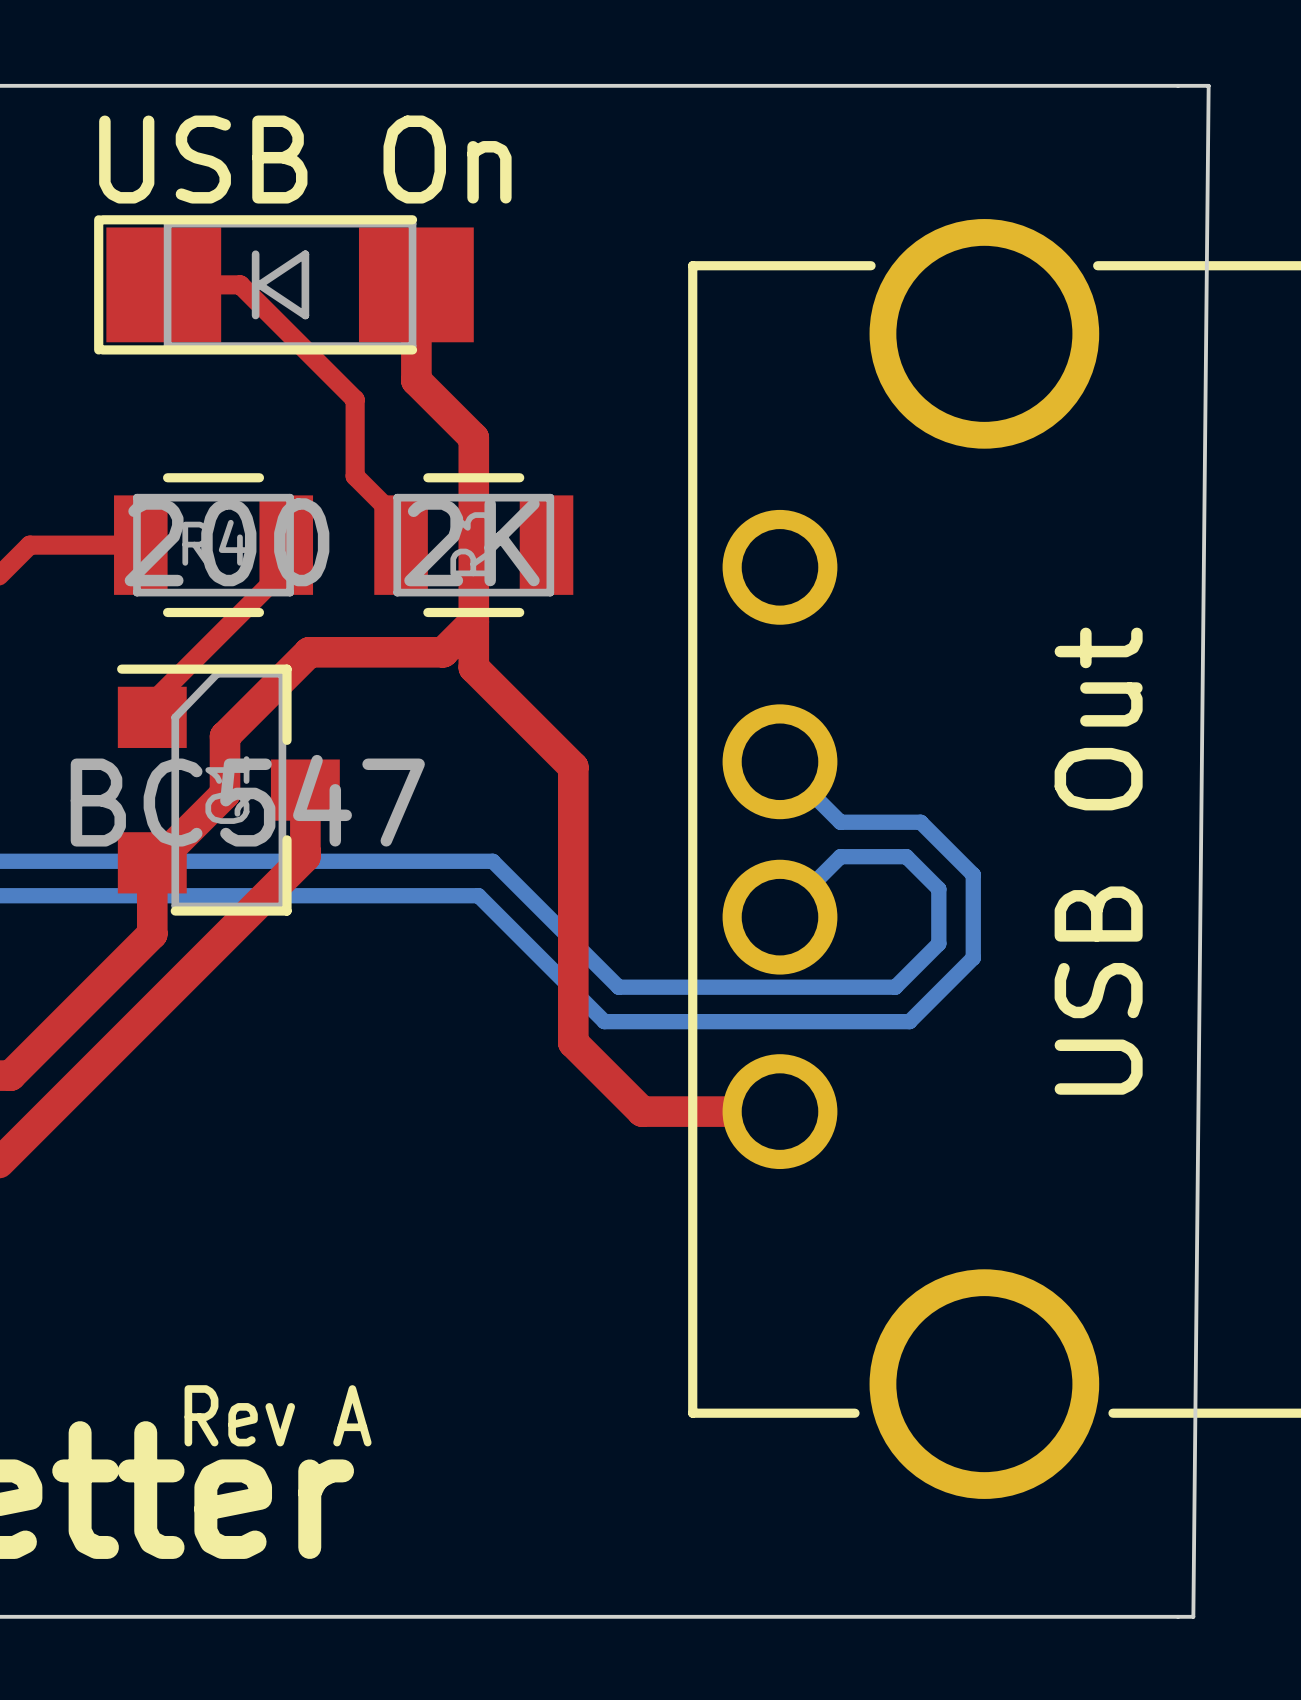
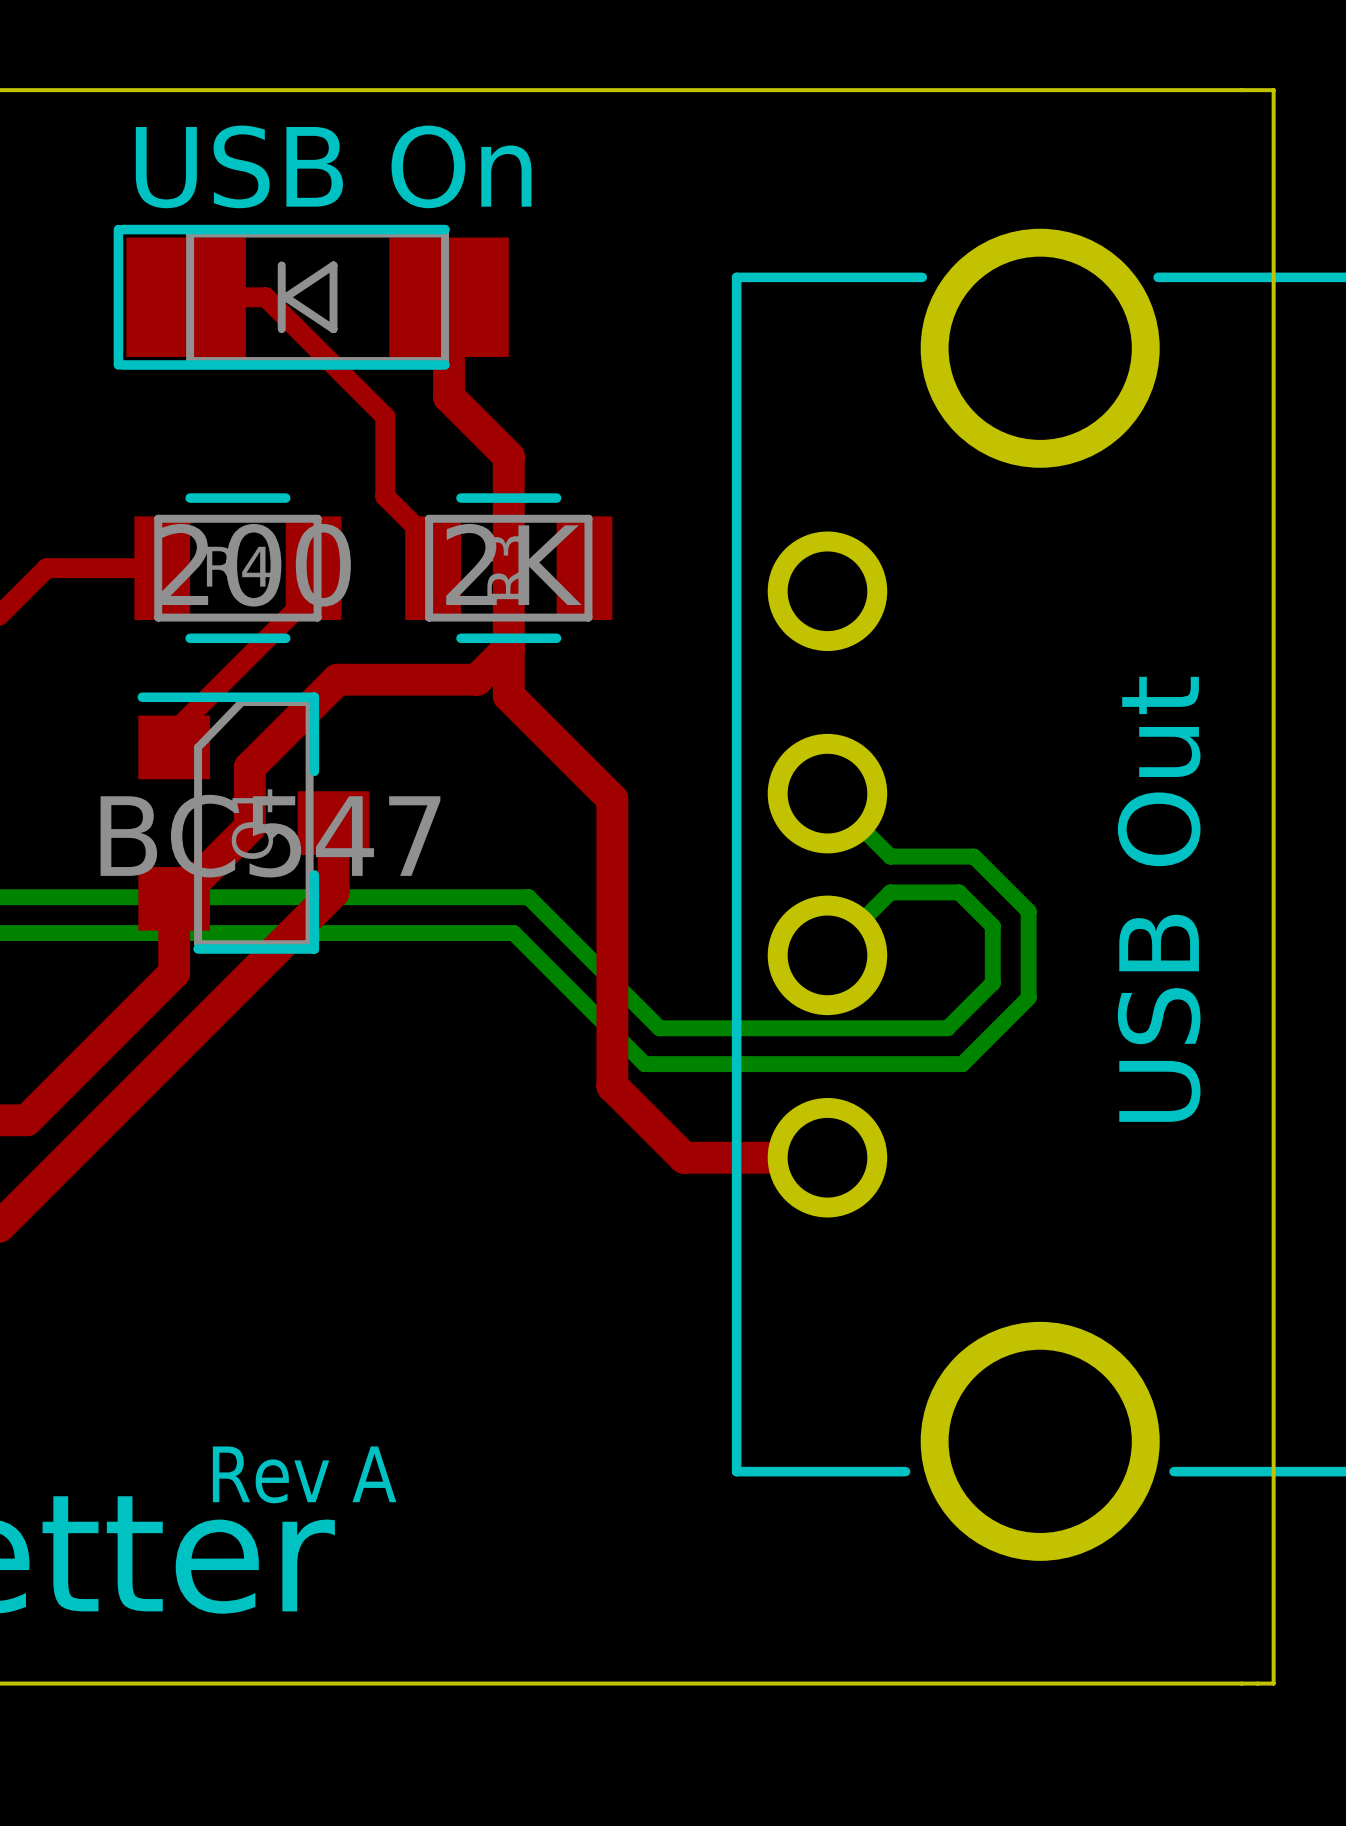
board edge: (1208, 85) (1193, 1616) -> (1273, 90) (1273, 1683) (1257, 1683)

